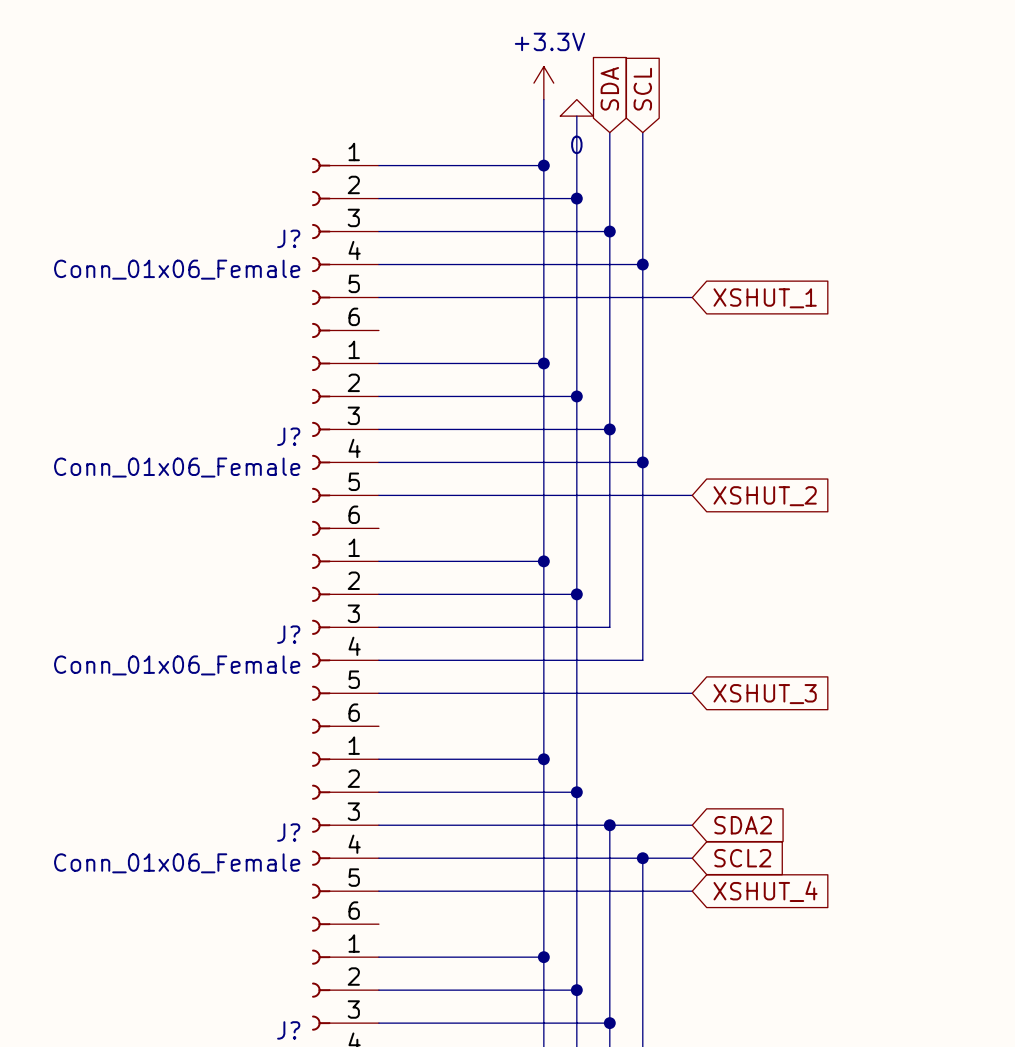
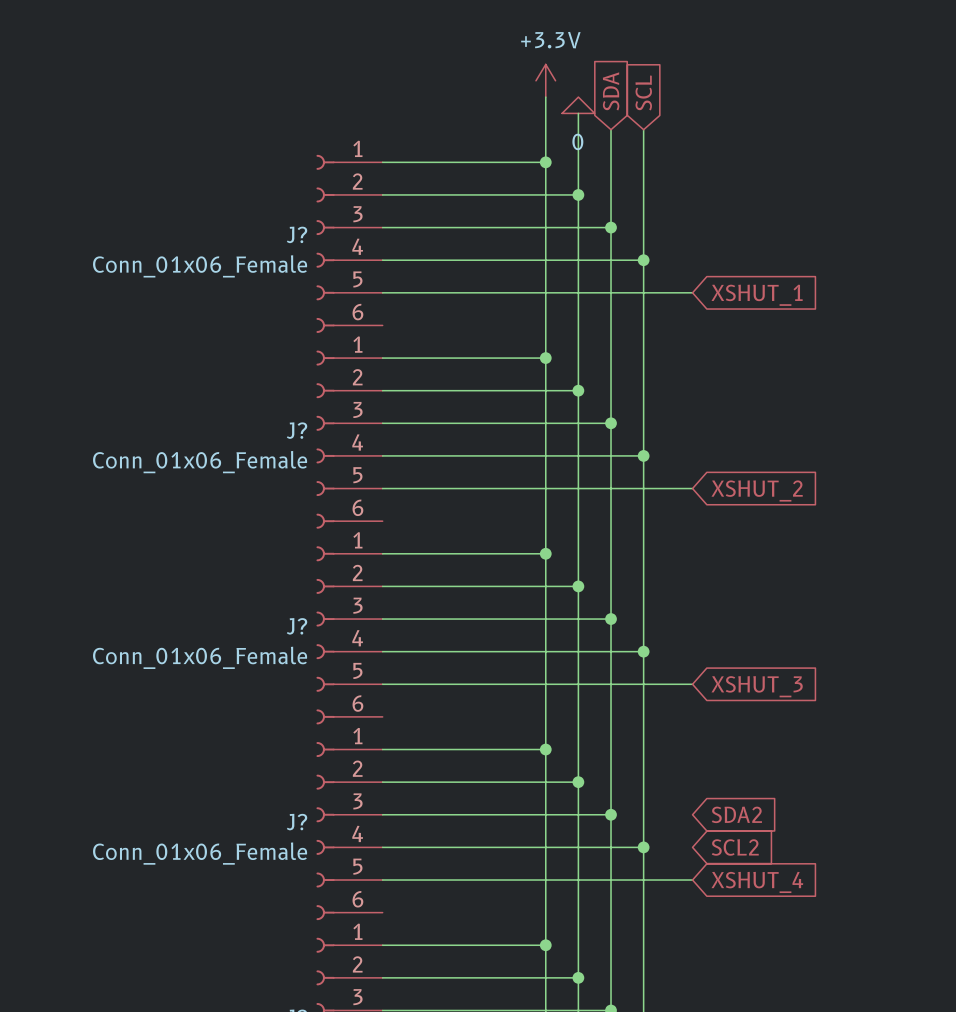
junction: none -> (611, 619)
junction: none -> (643, 651)
wire: (609, 825) (692, 825) -> (611, 814) (611, 619)
wire: (642, 858) (692, 858) -> (643, 847) (643, 651)

